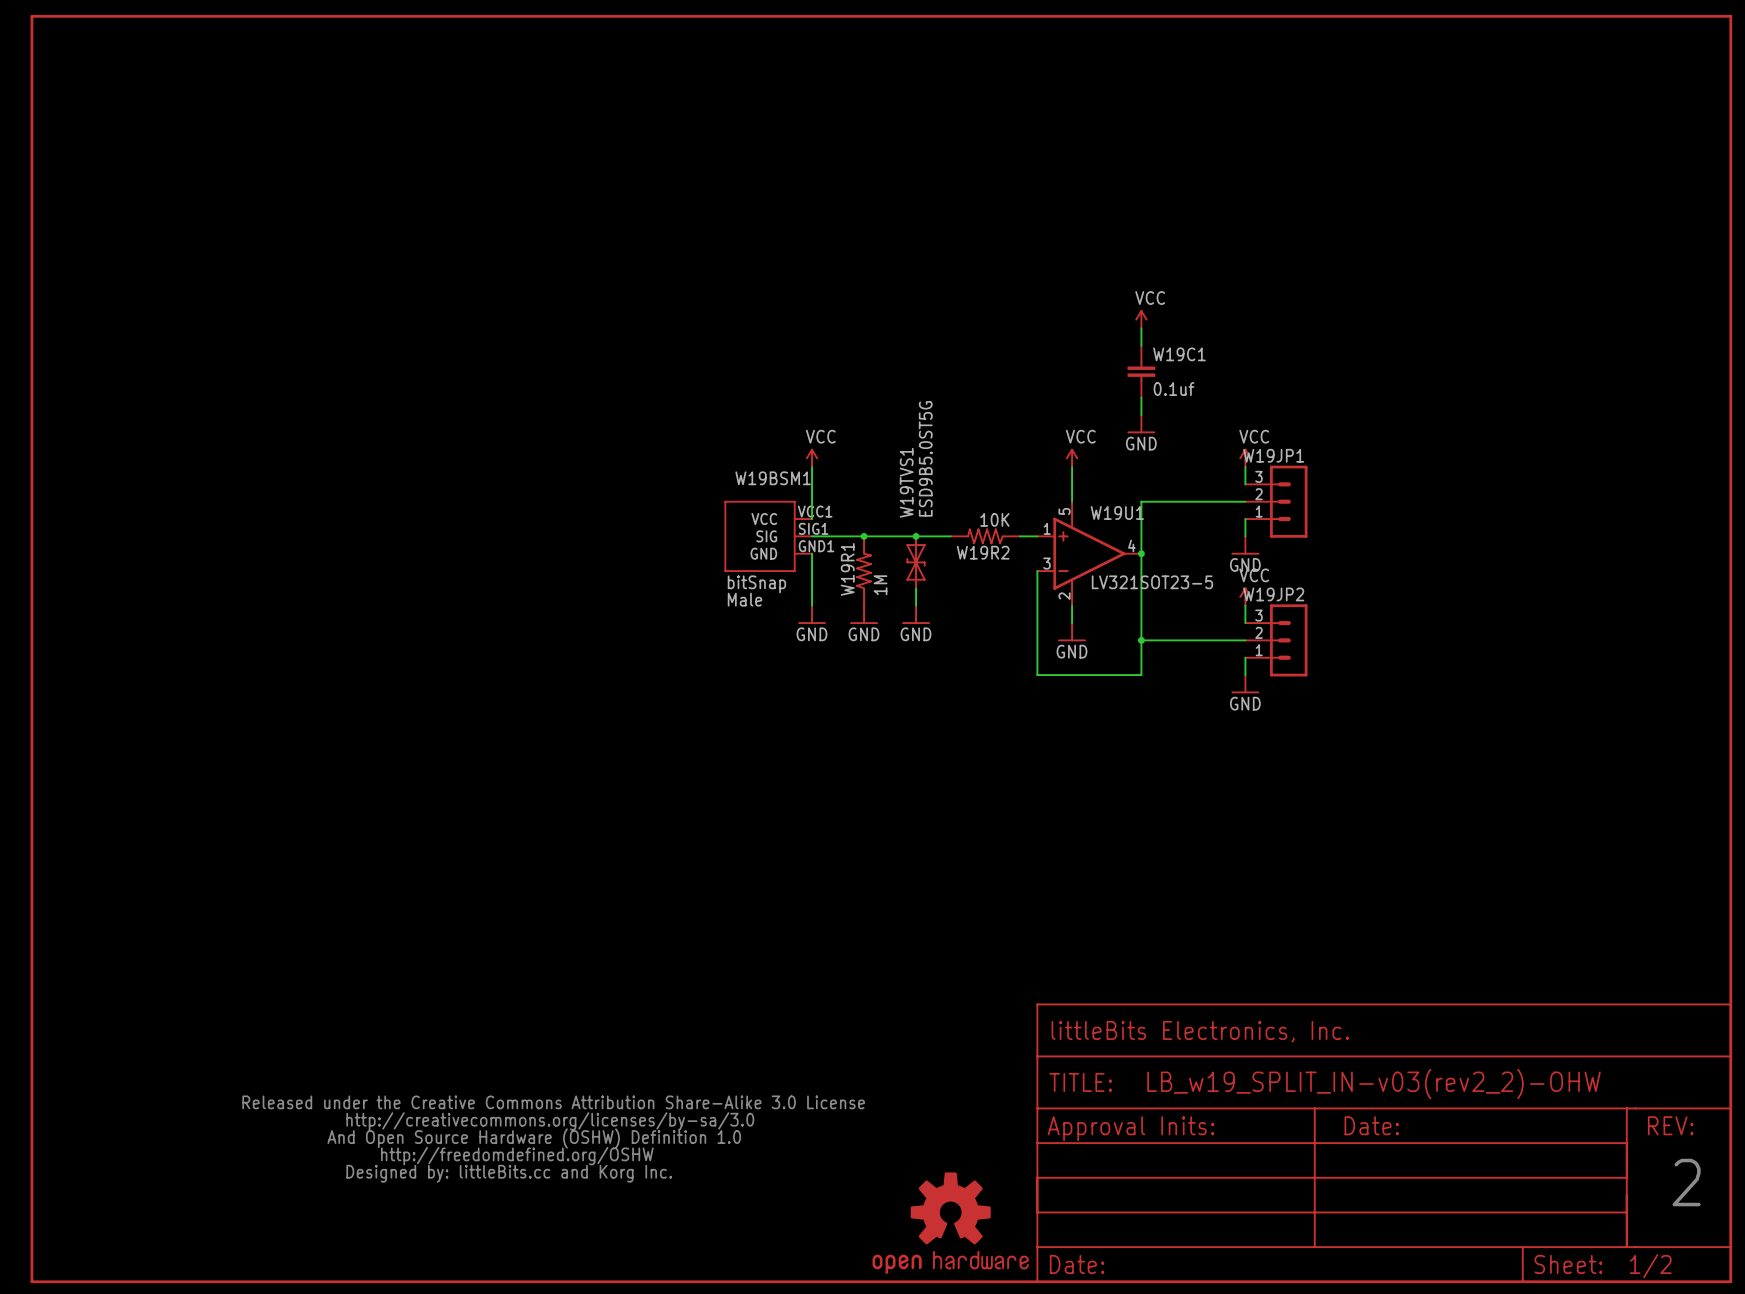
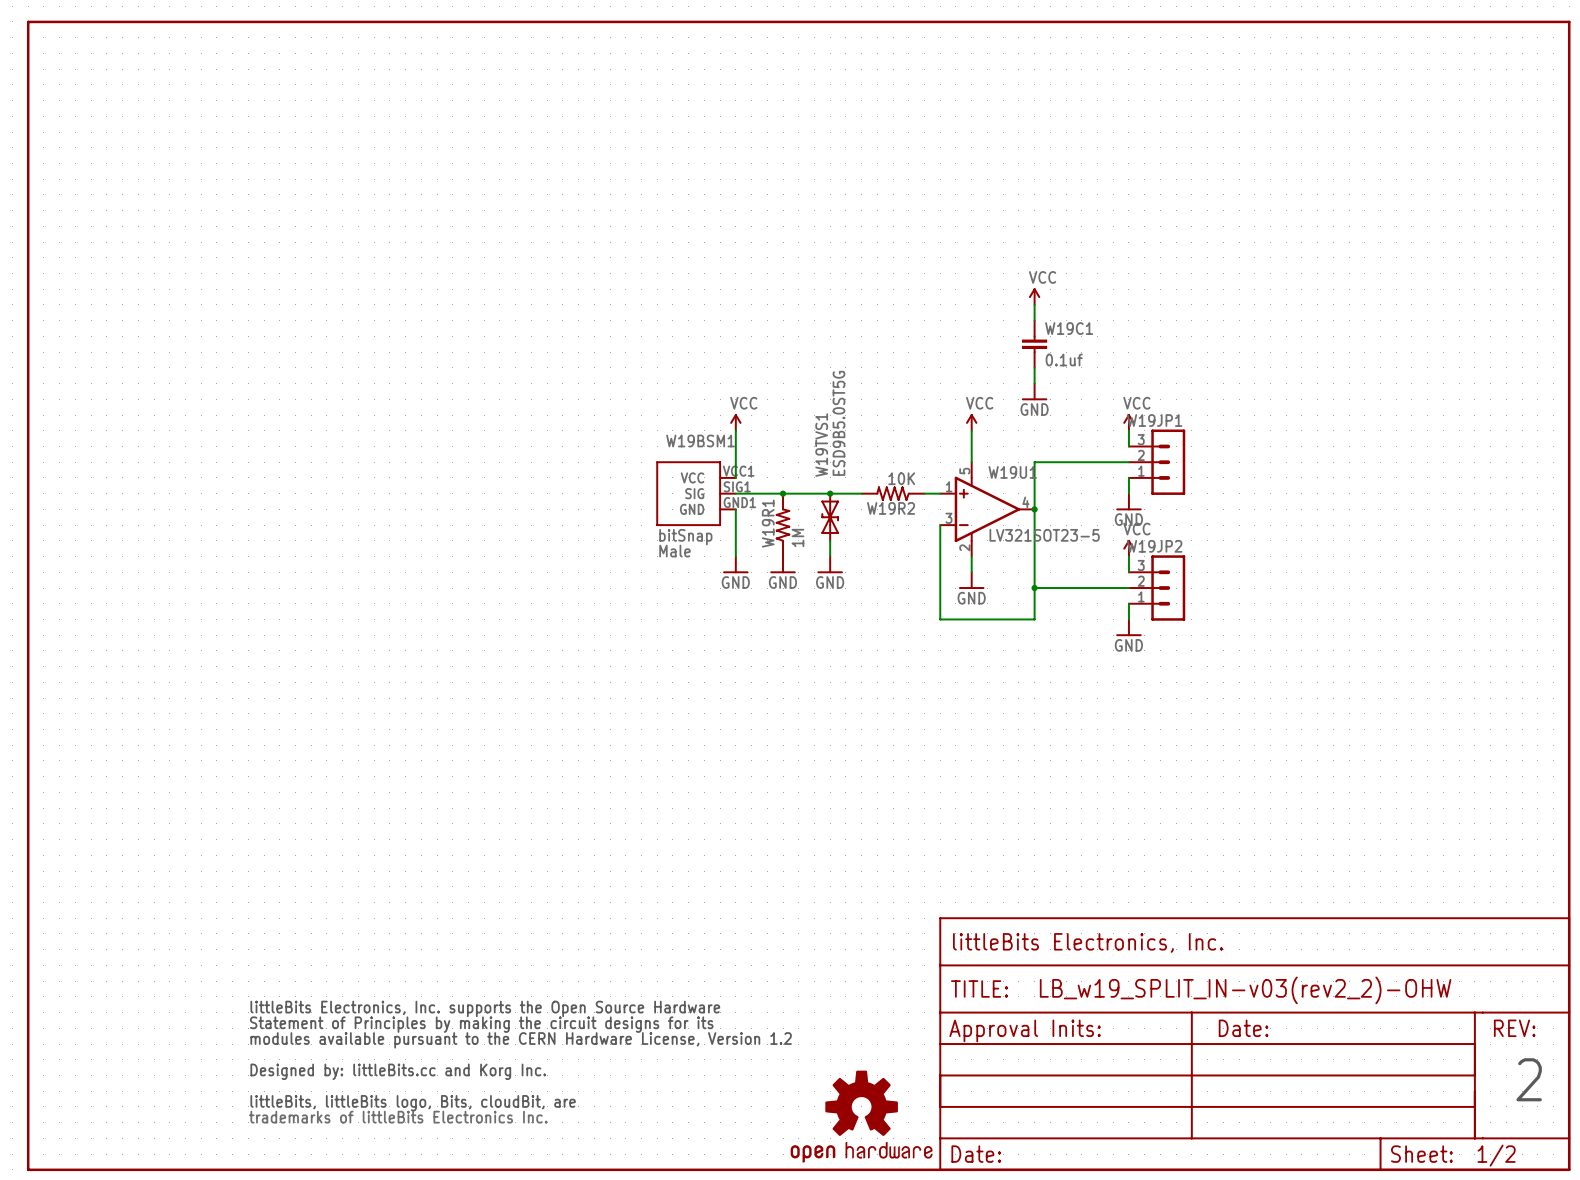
part: (553, 1139) -> none
part: none -> (520, 1062)

